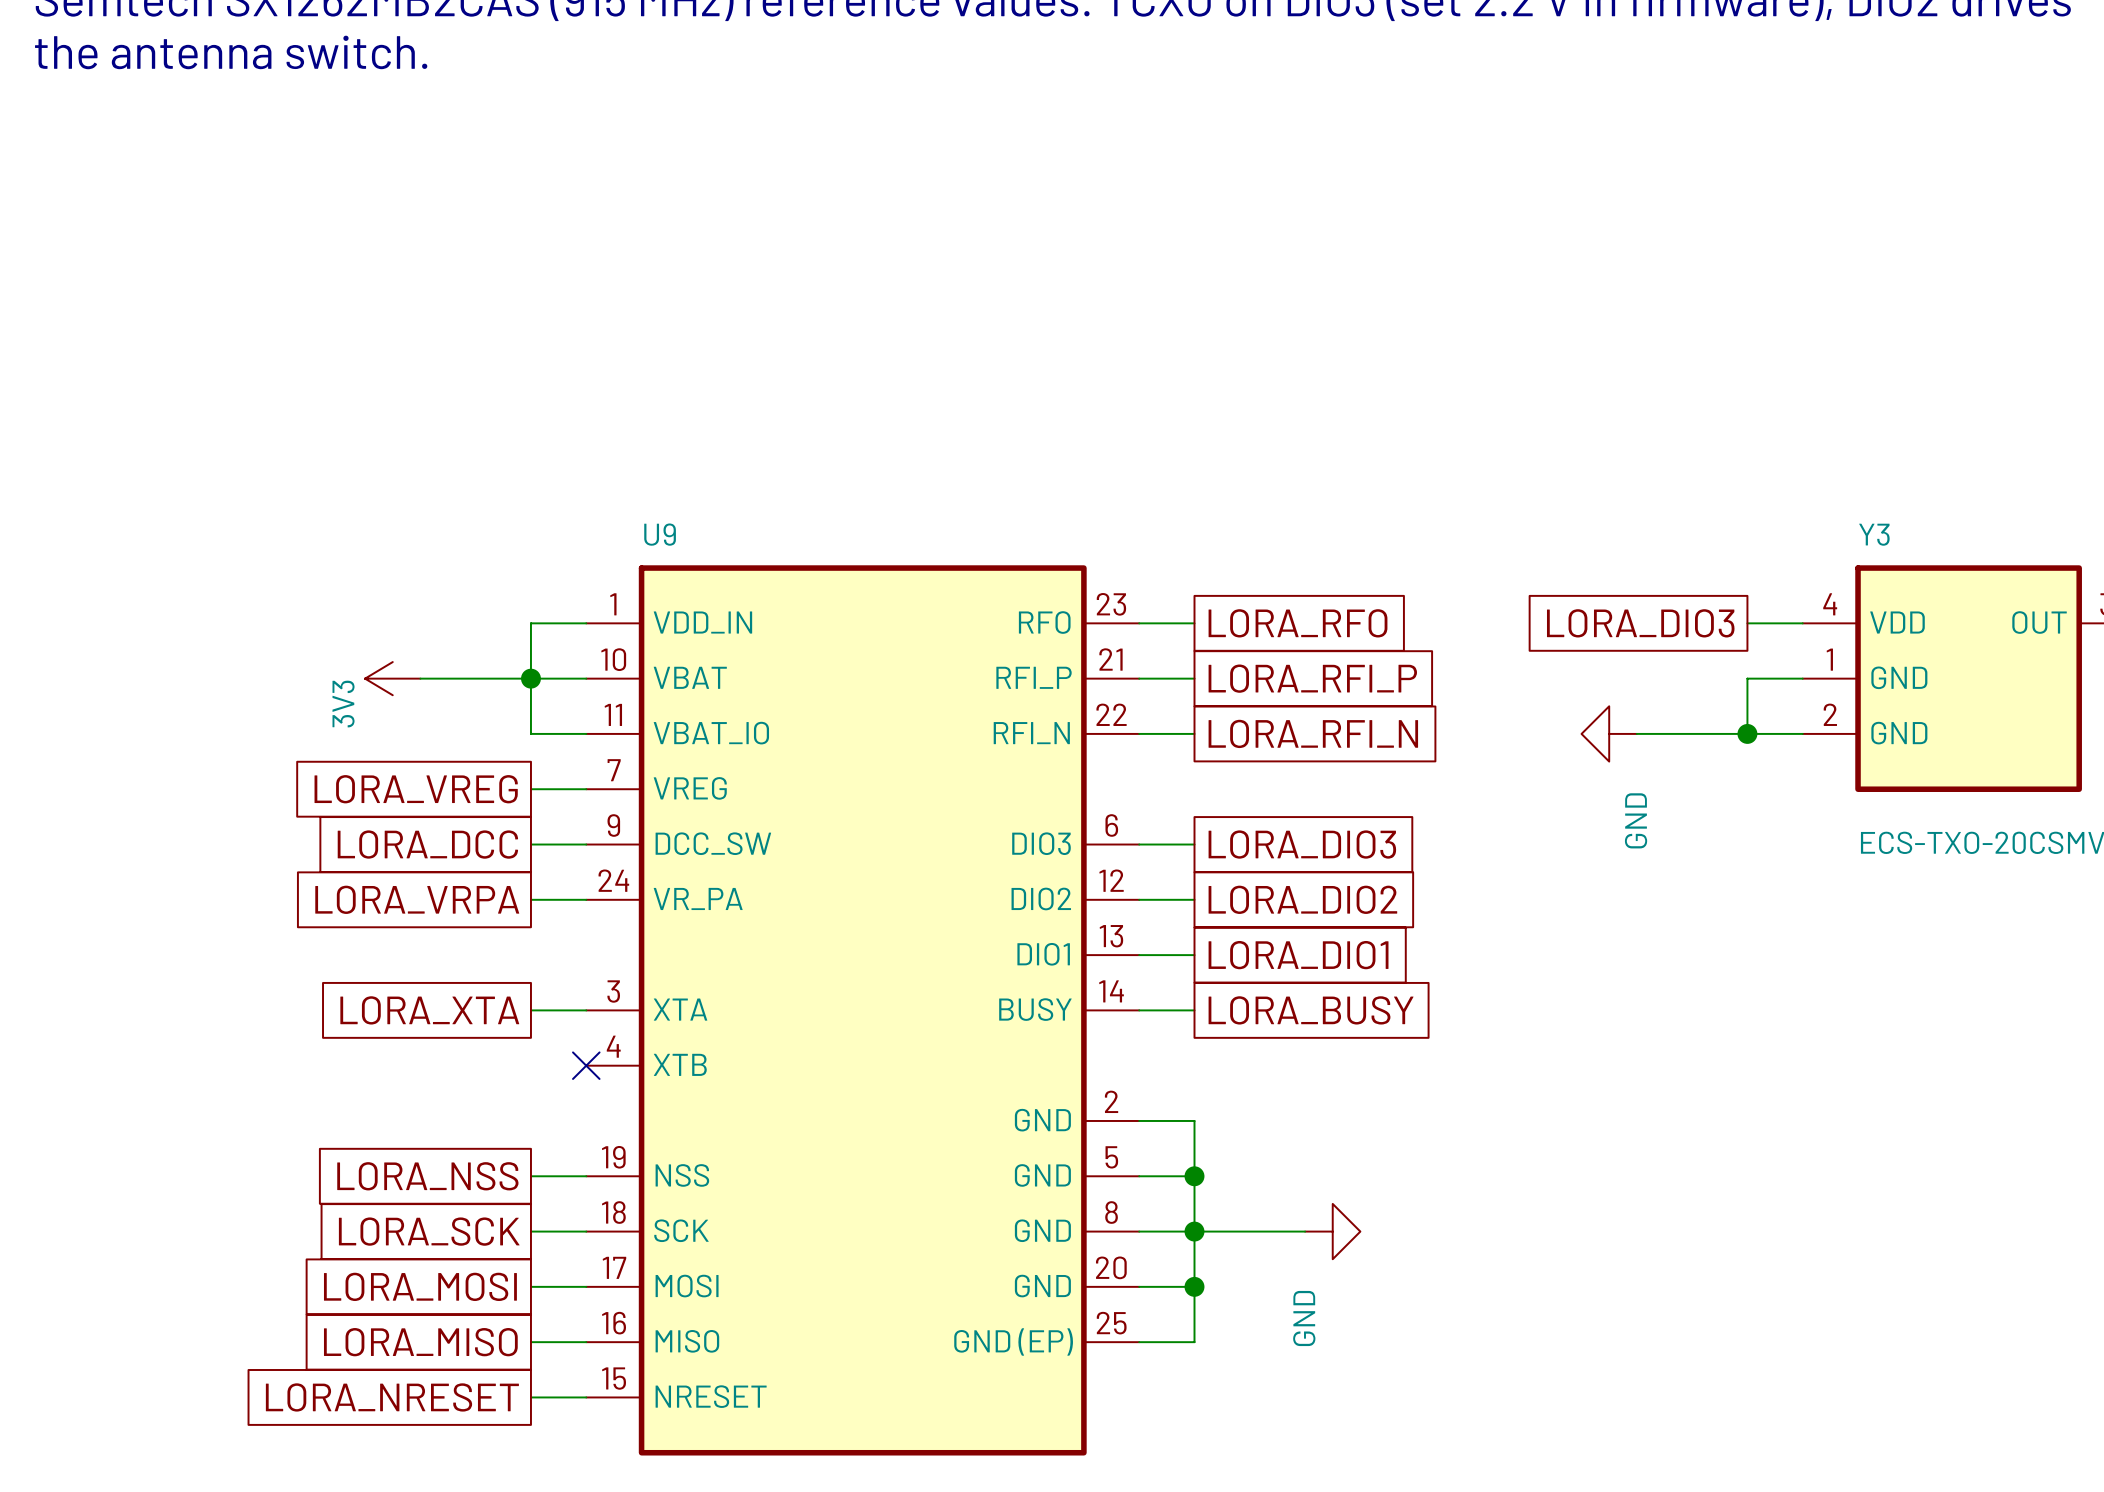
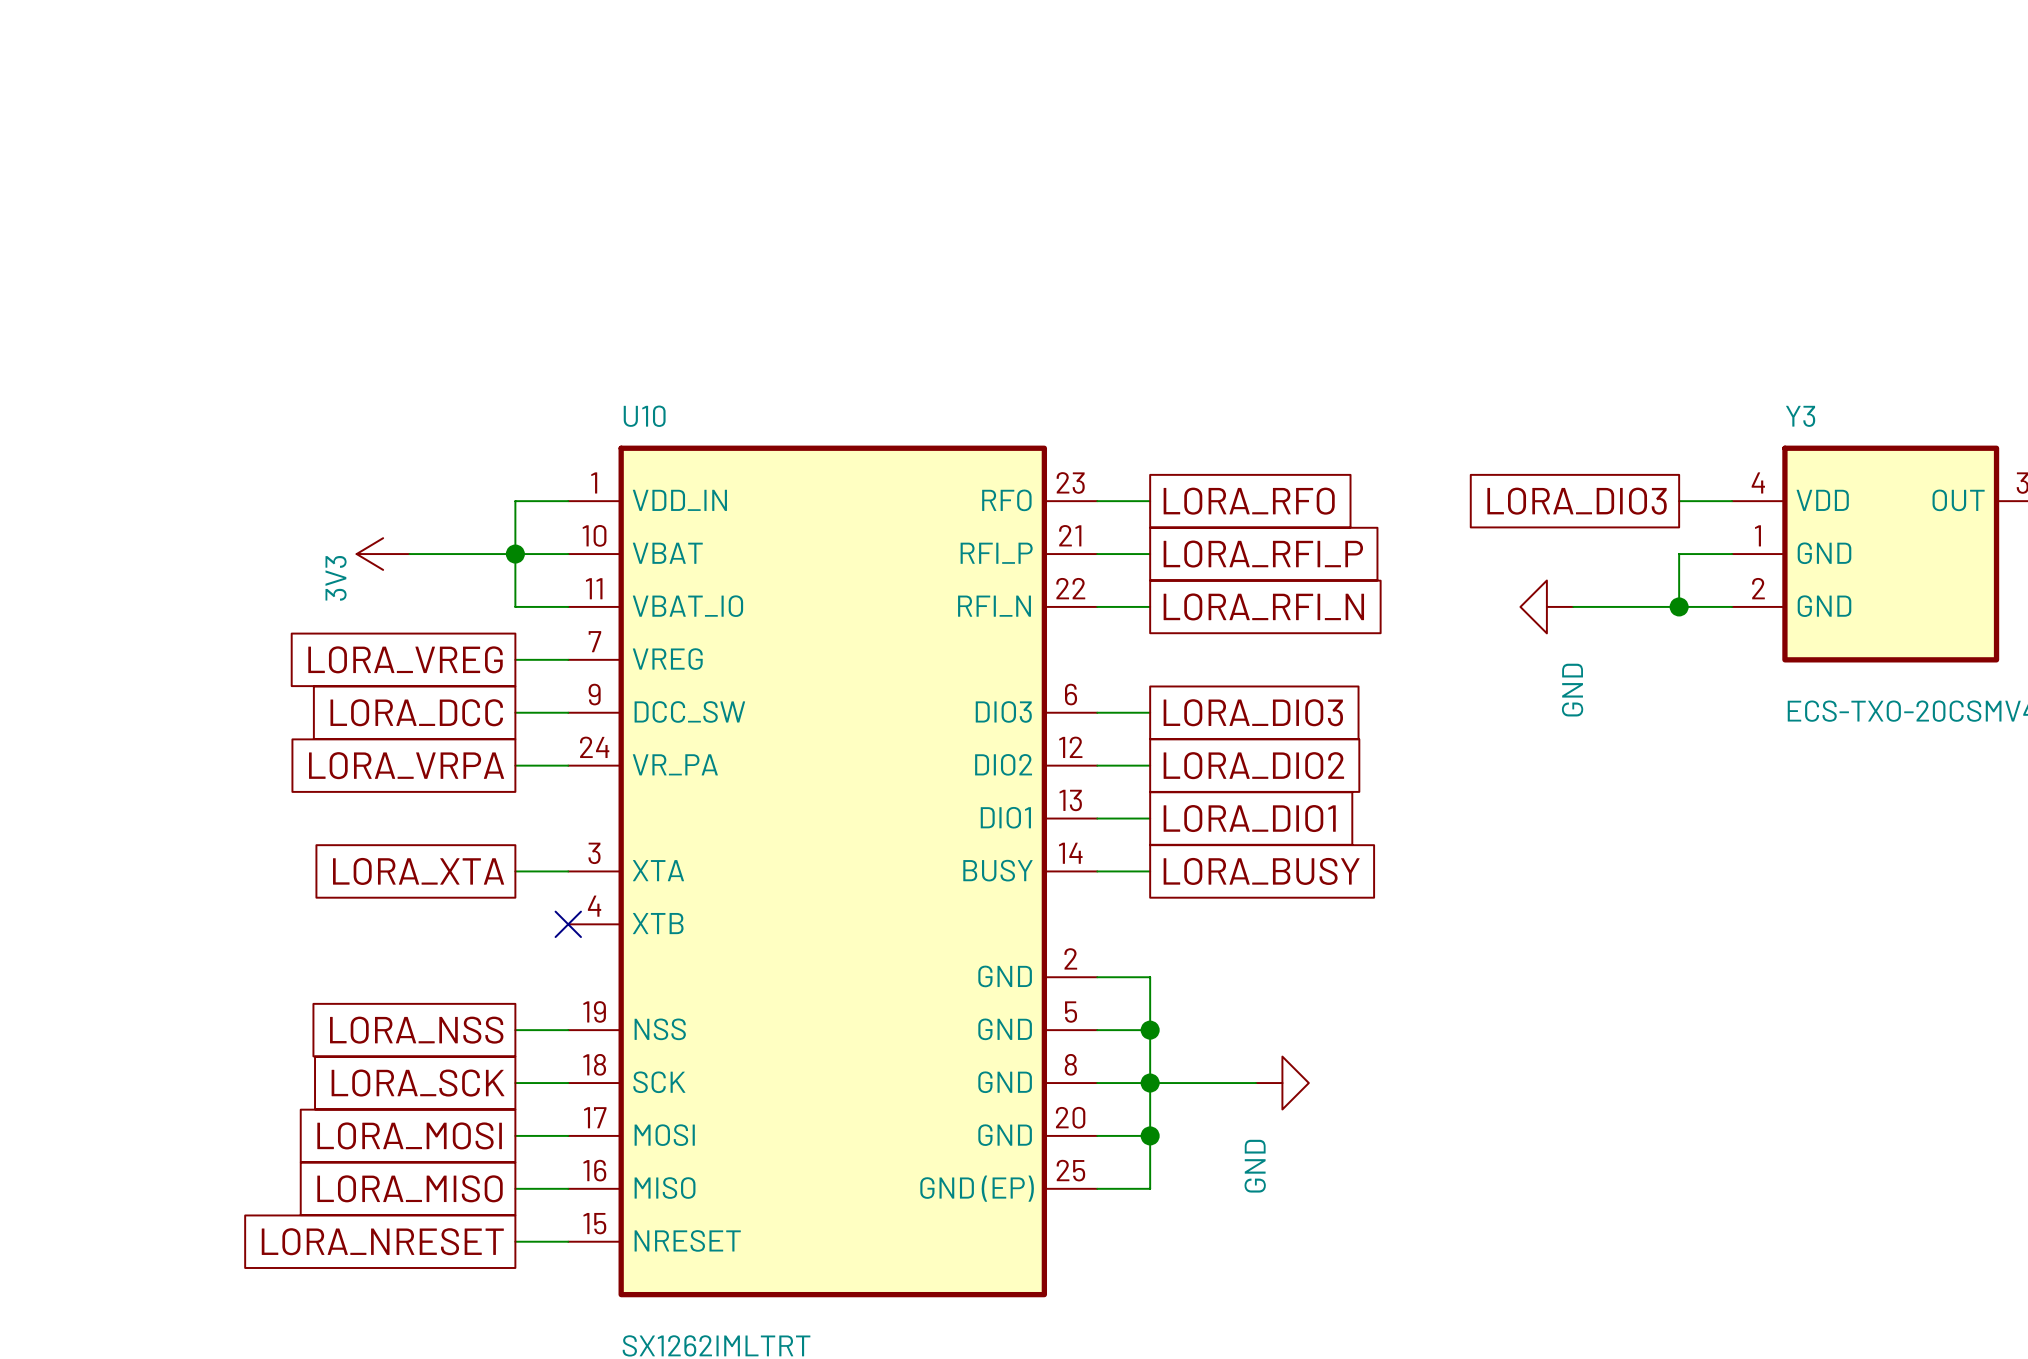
U9 name: U9 (660, 534) -> U10 (644, 416)

